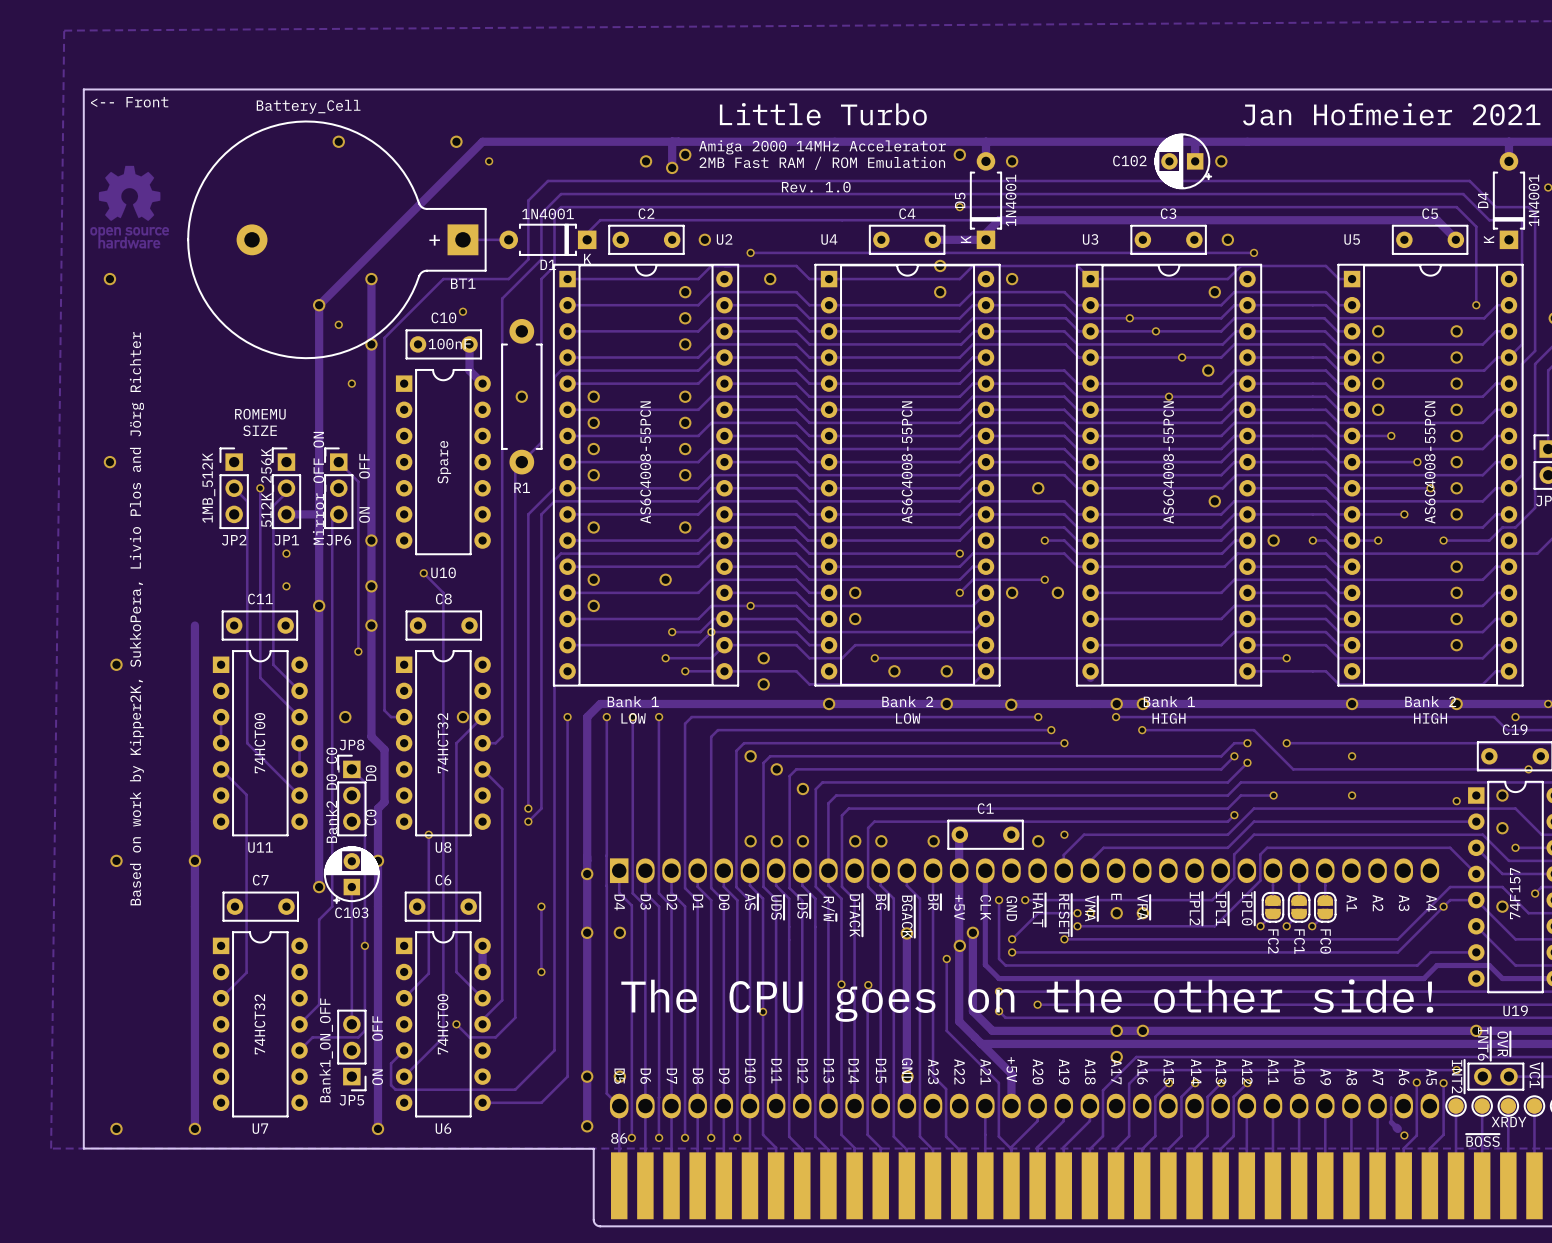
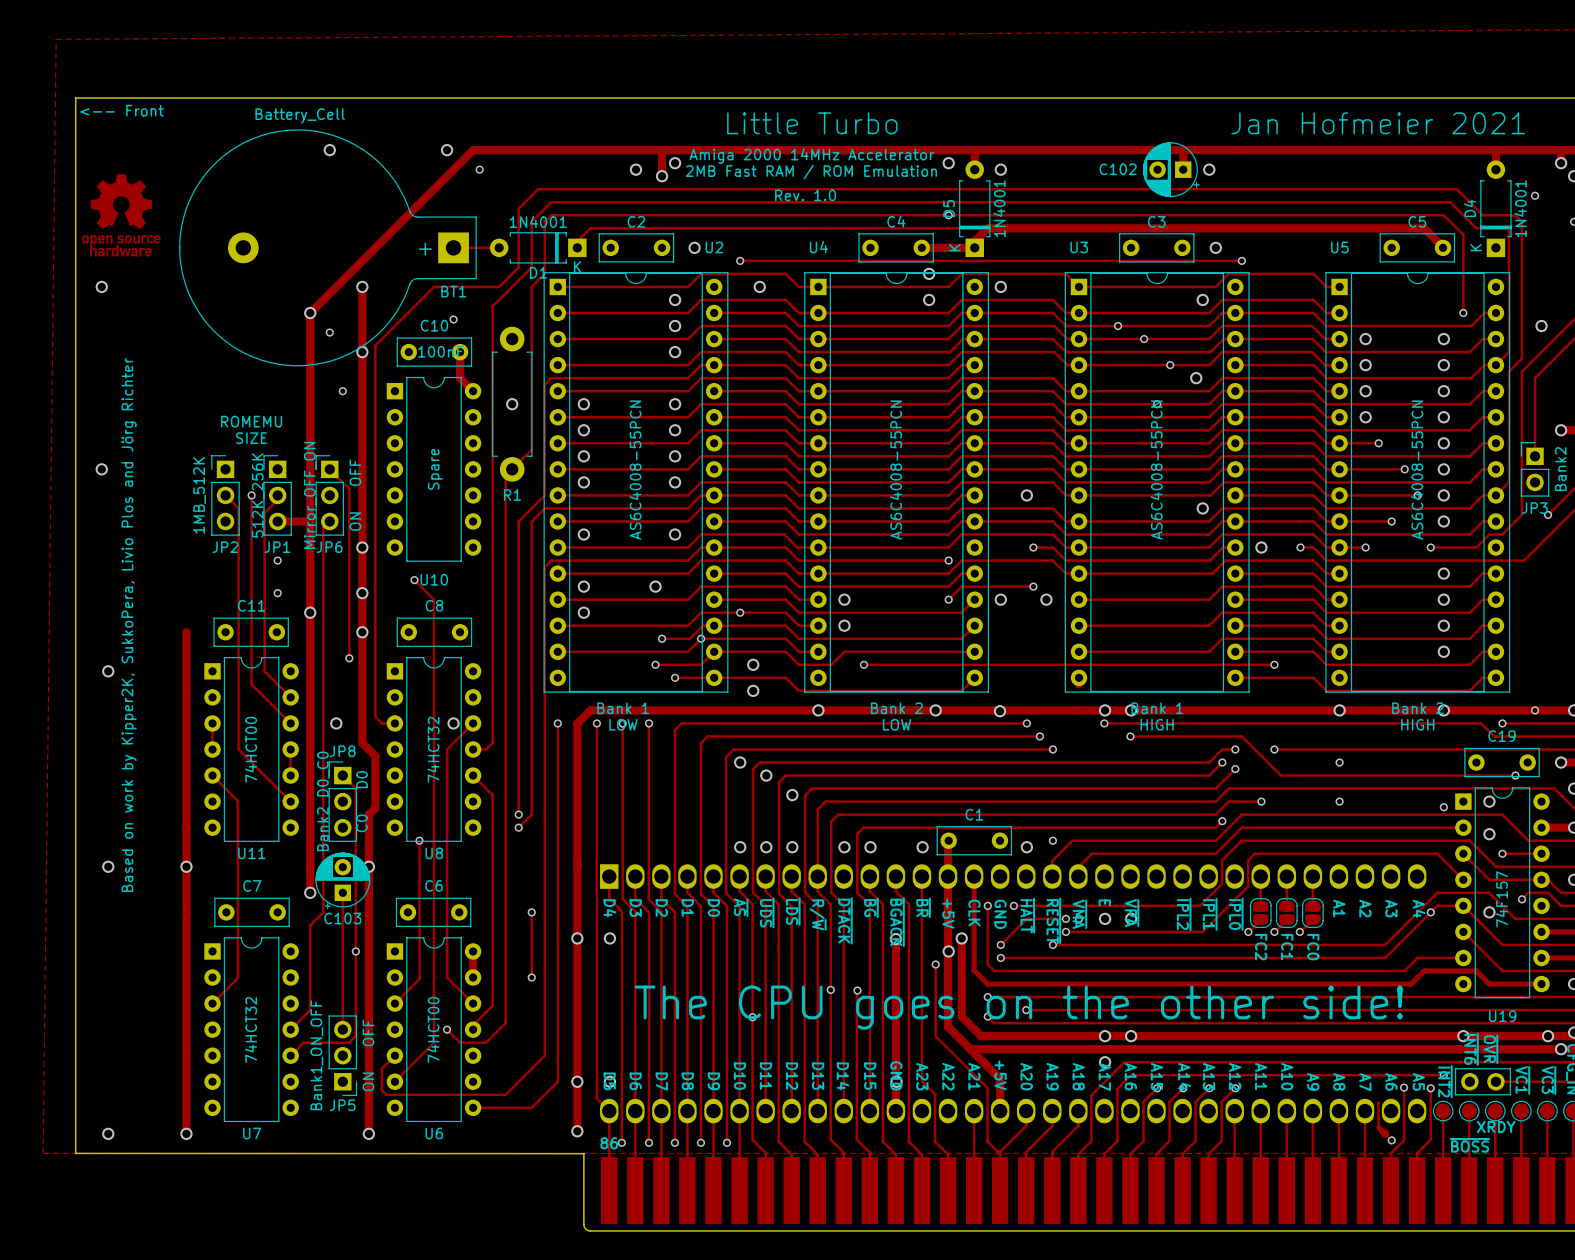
via: (894, 671) -> none
via: (946, 671) -> none
via: (587, 873) -> none

